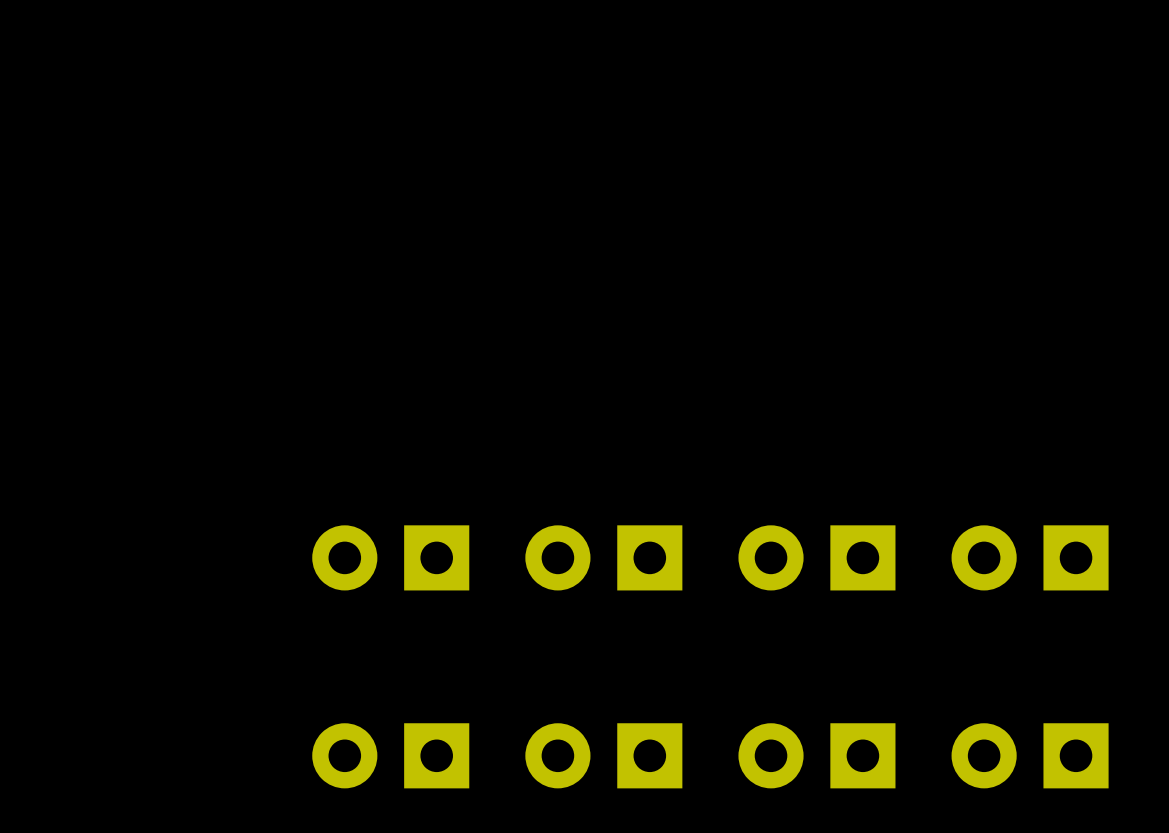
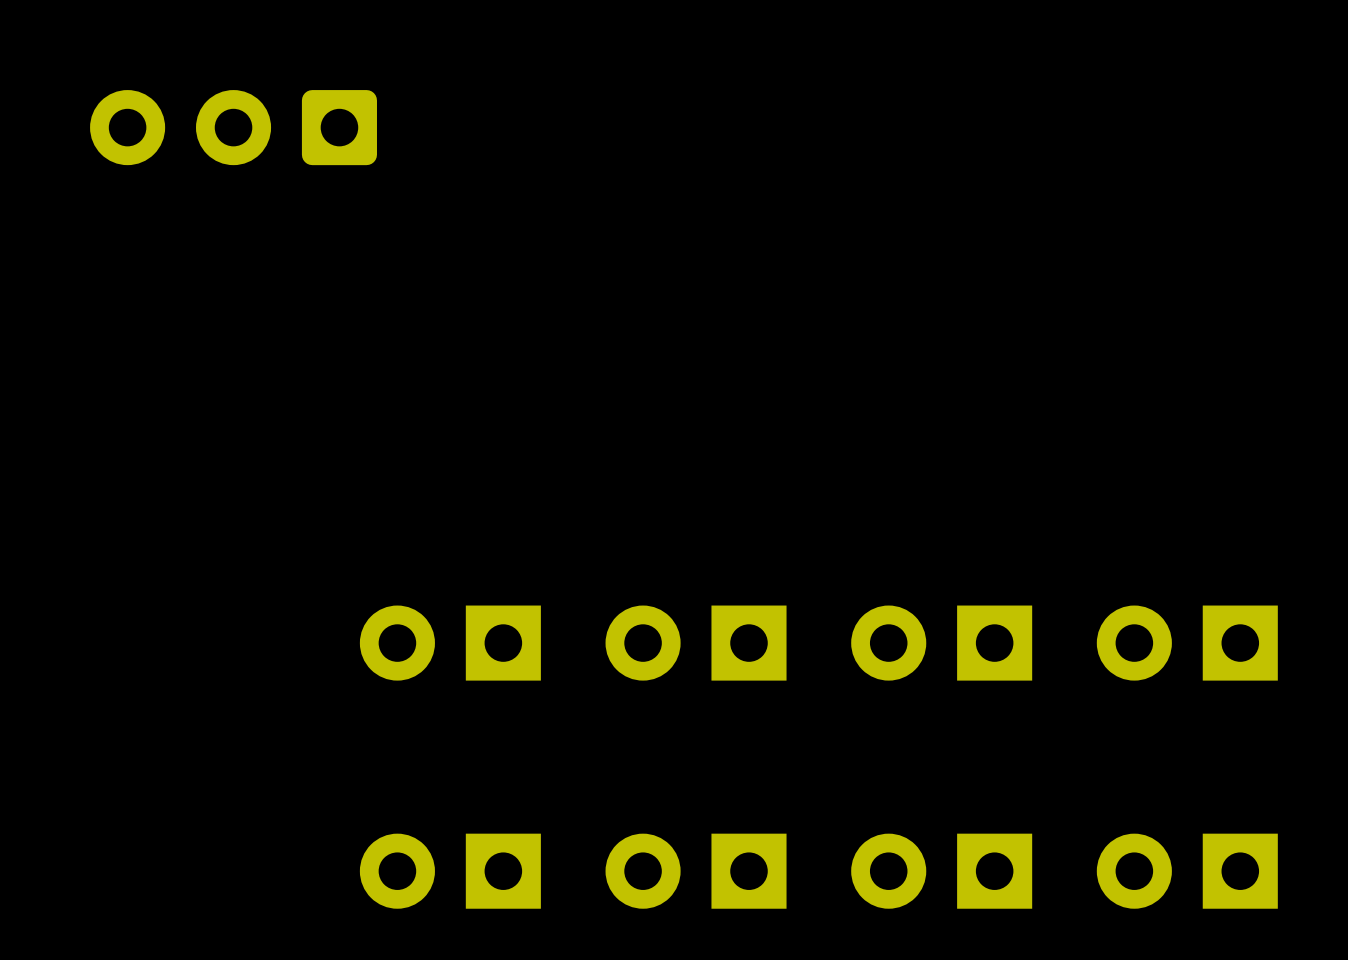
part: none -> (233, 127)

